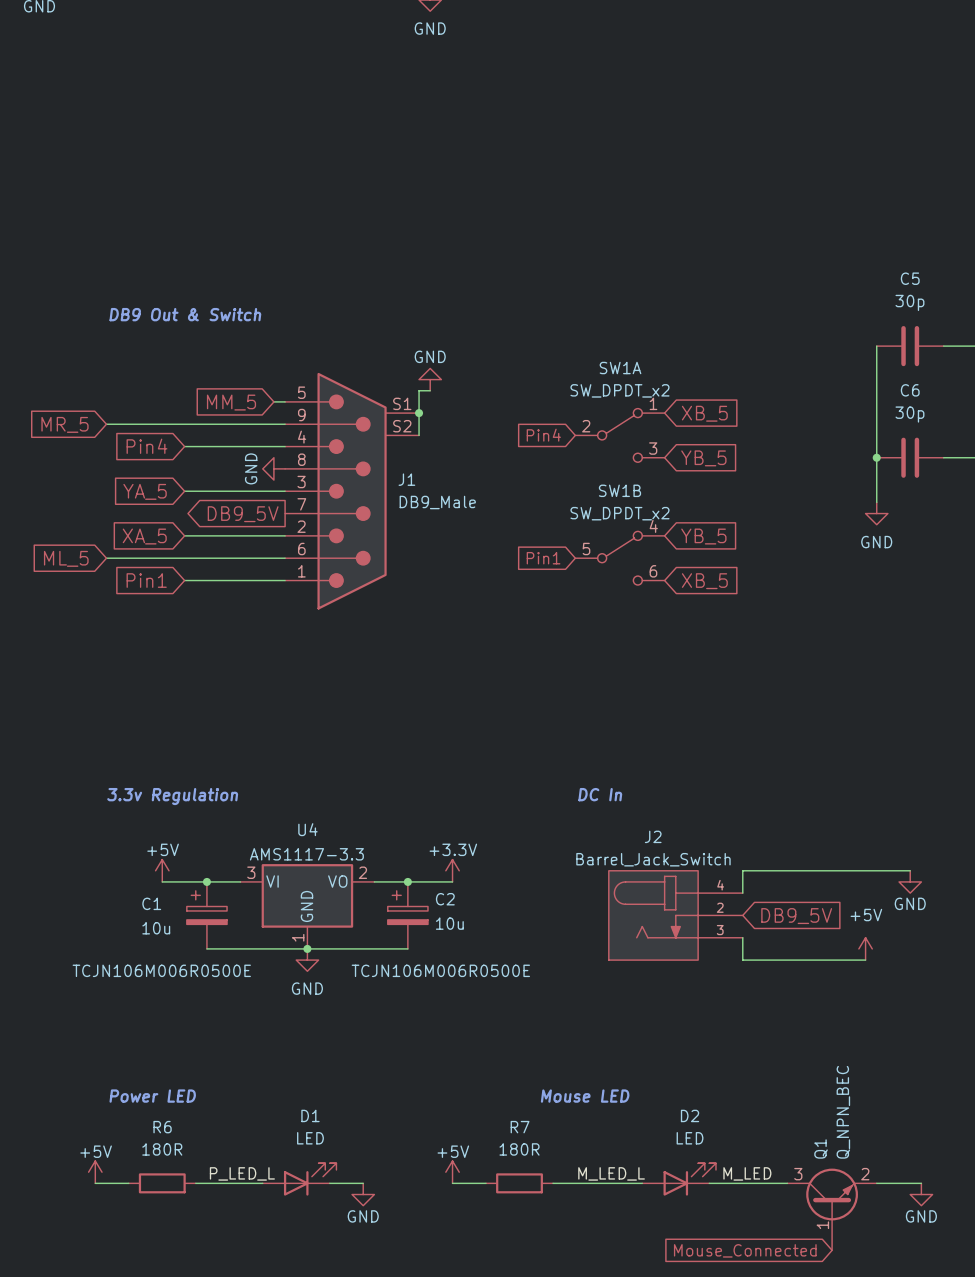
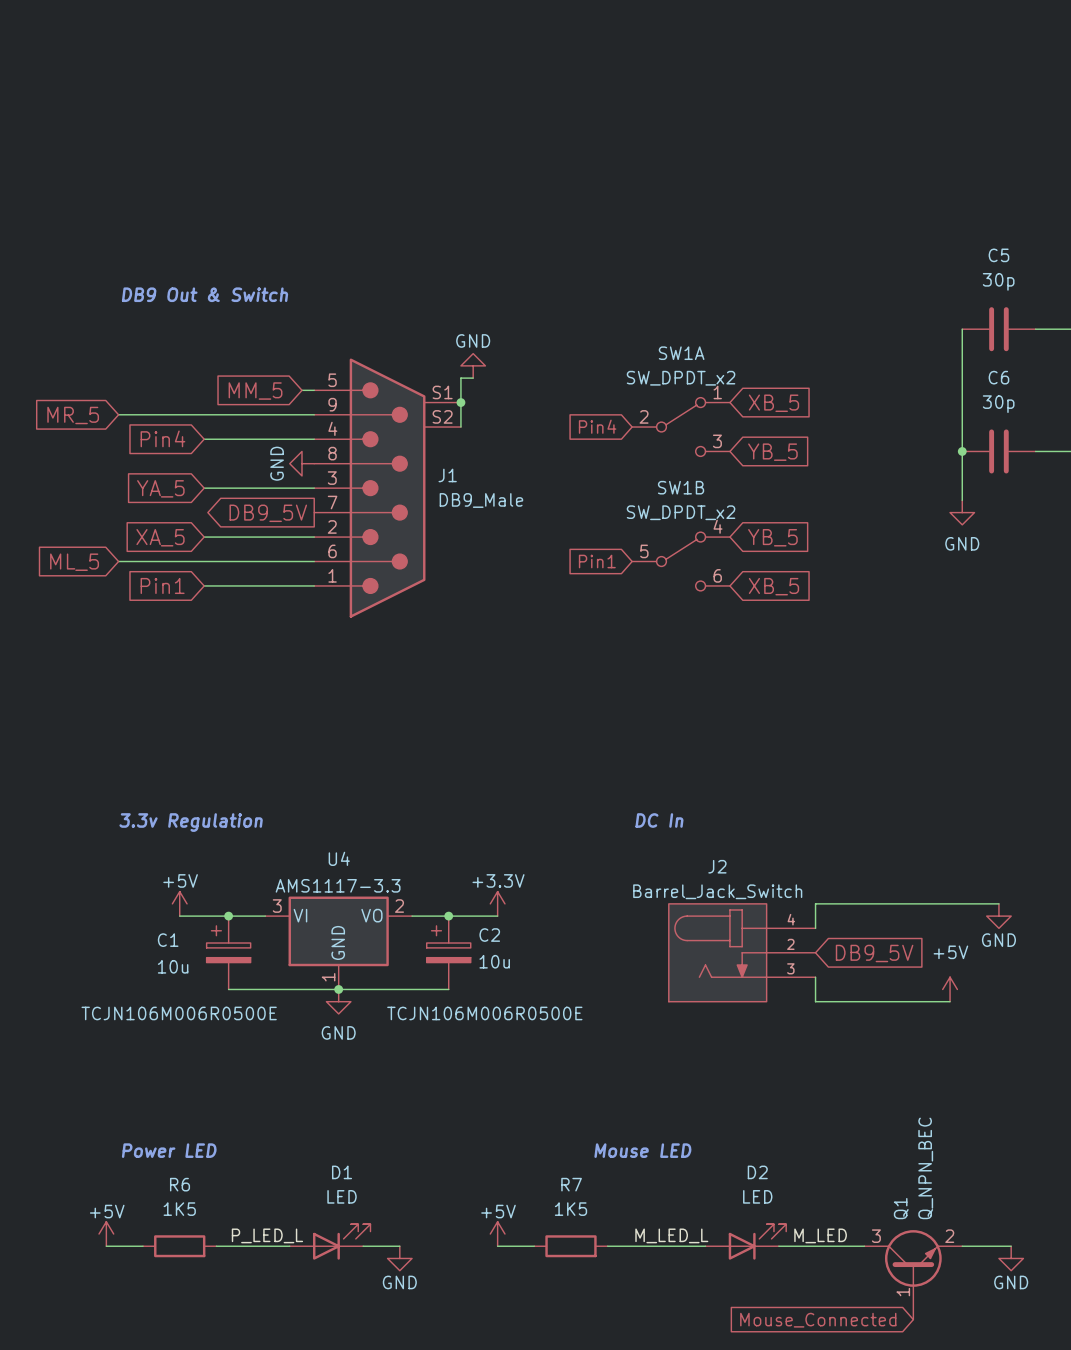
R6 value: 180R (162, 1149) -> 1K5 (179, 1209)
R7 value: 180R (519, 1149) -> 1K5 (570, 1209)

